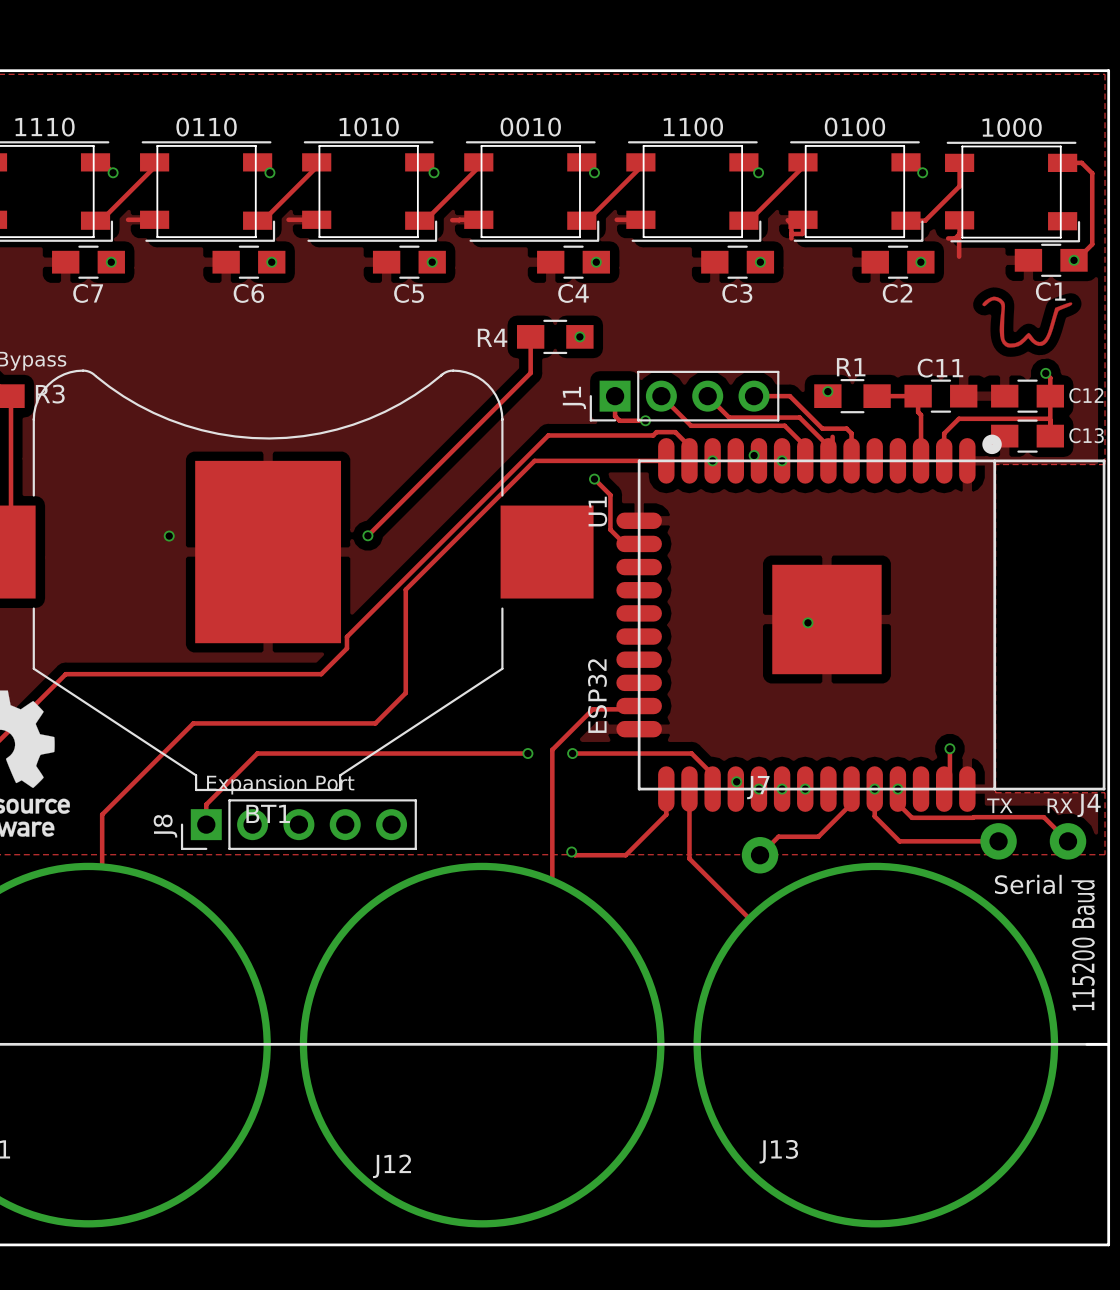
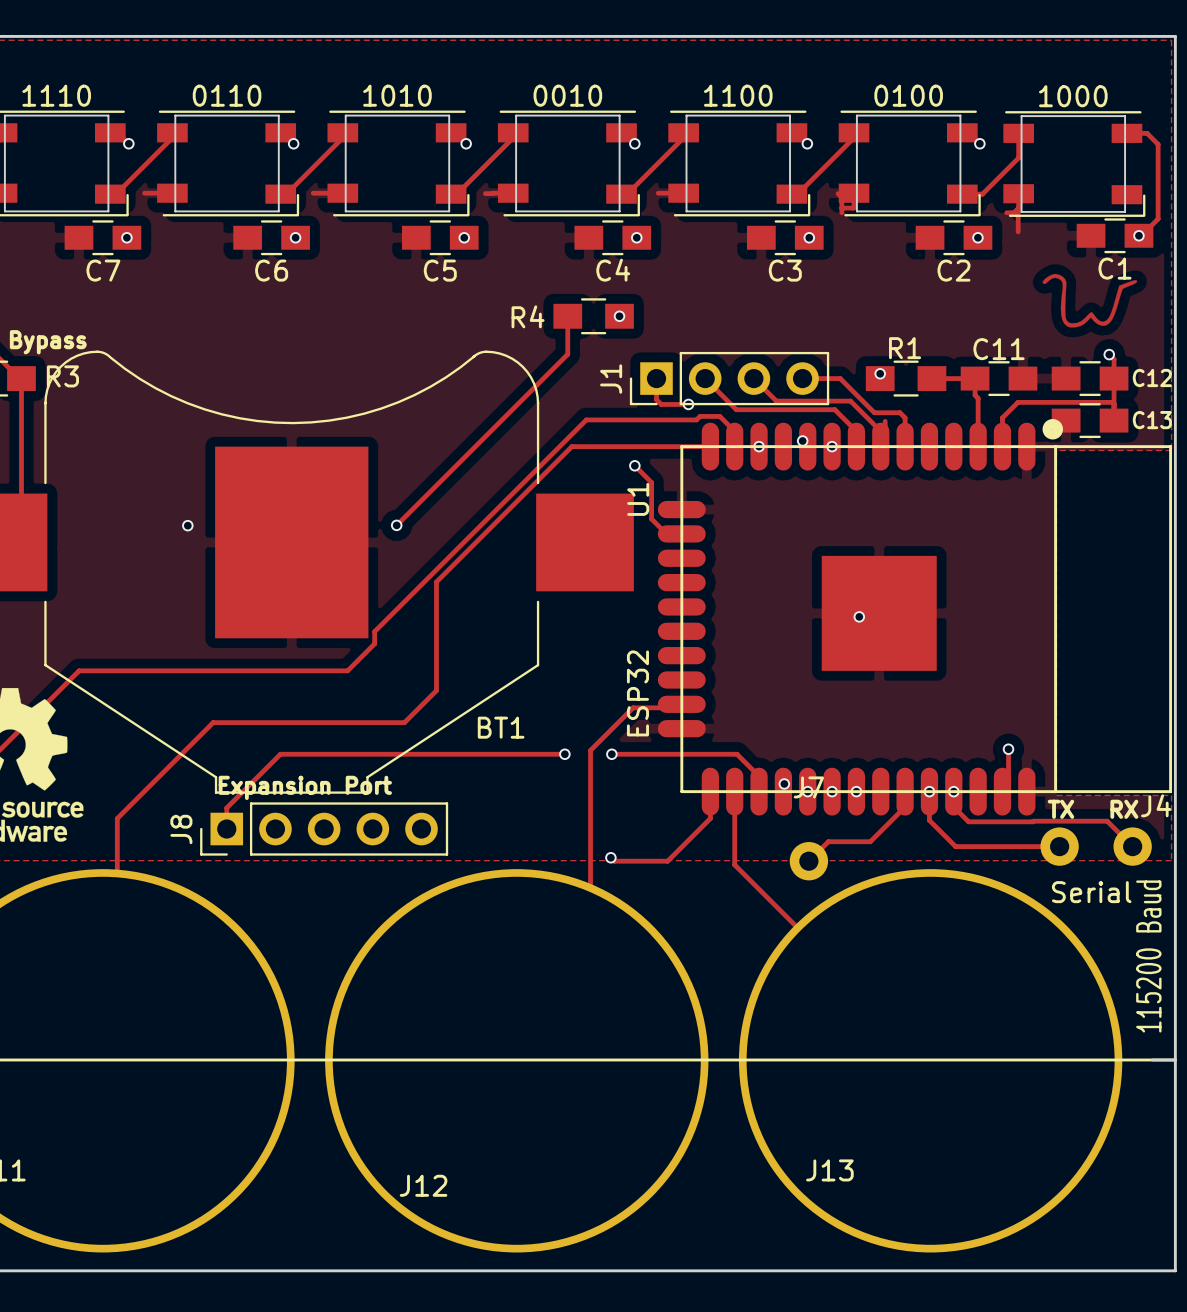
BT1 name position: BT1 (268, 813) -> BT1 (501, 727)

